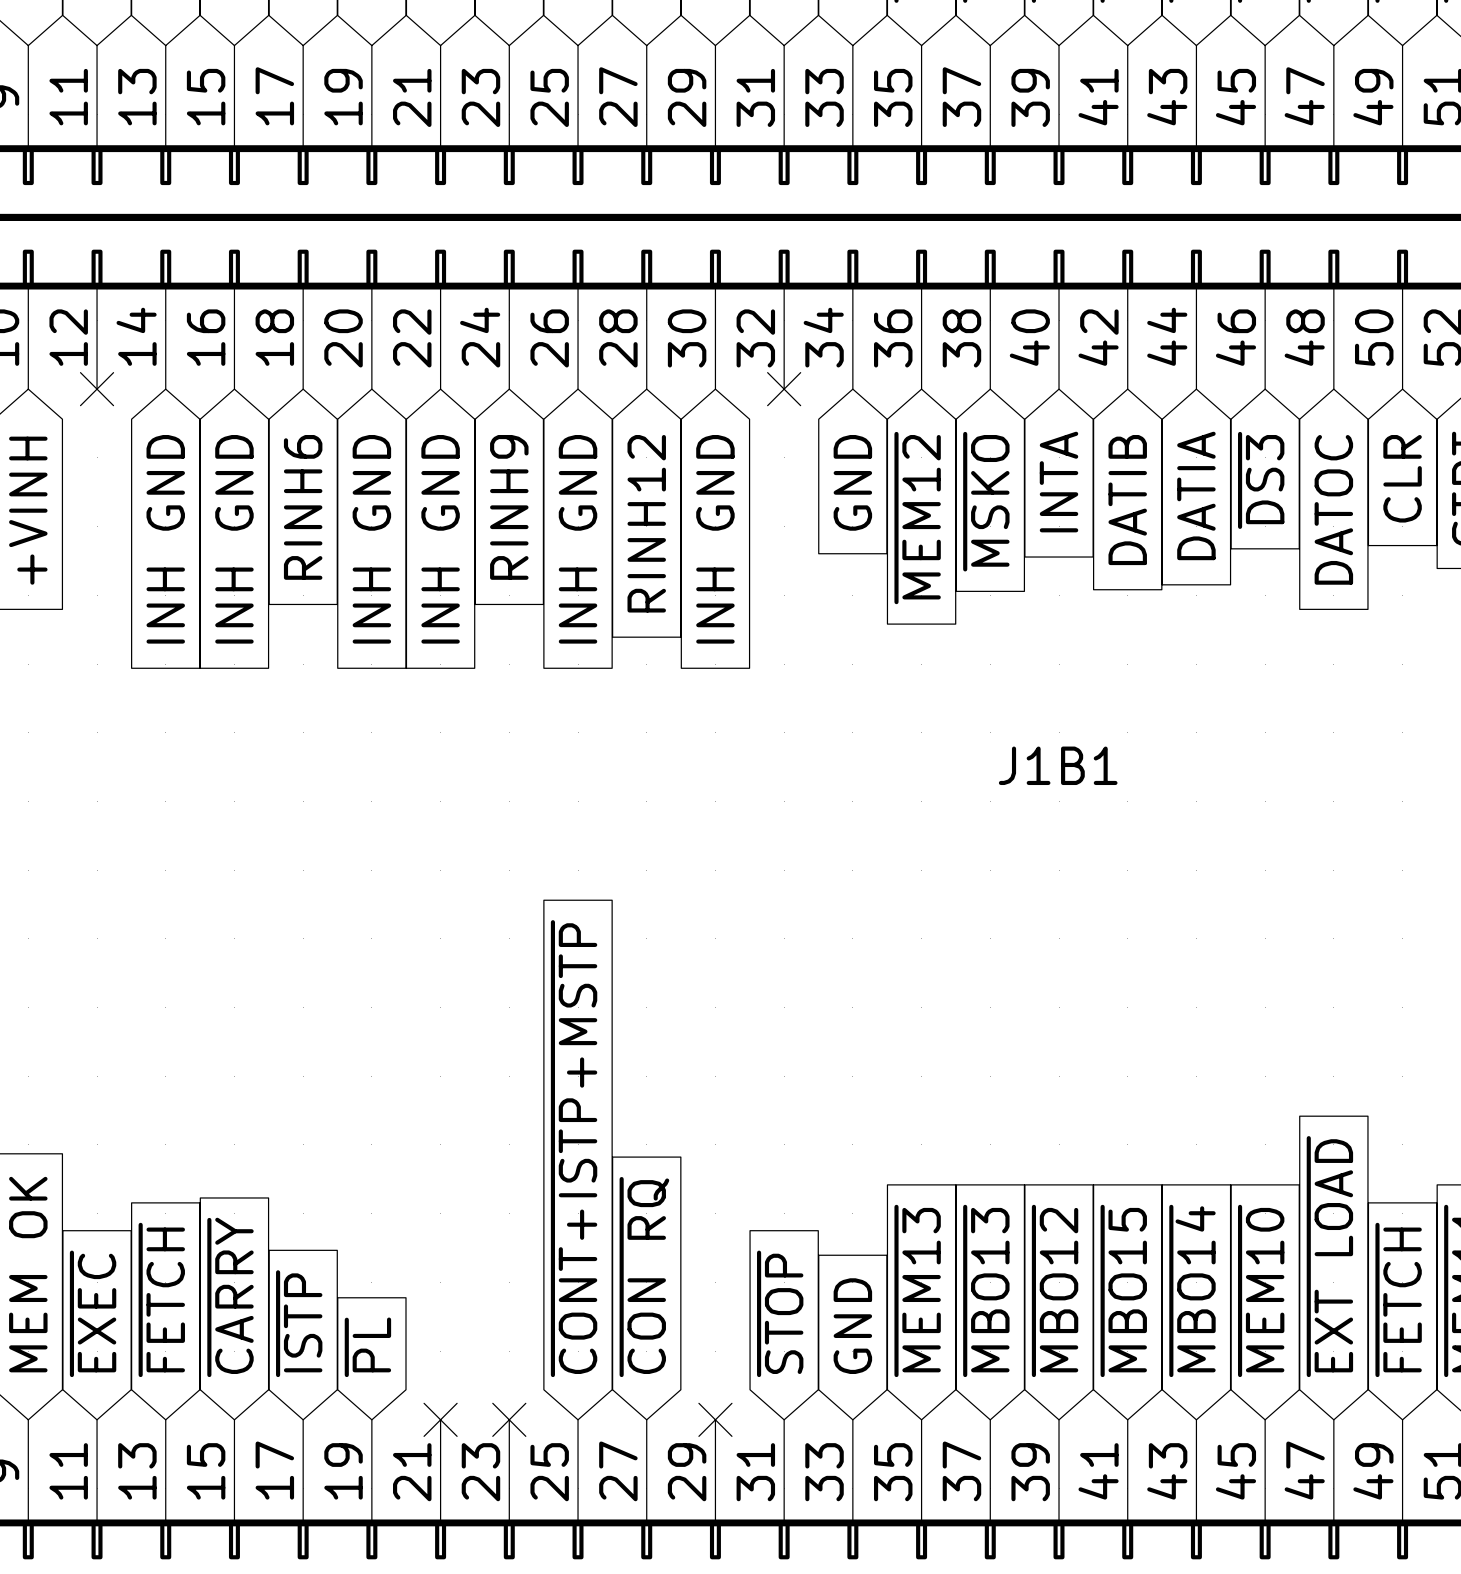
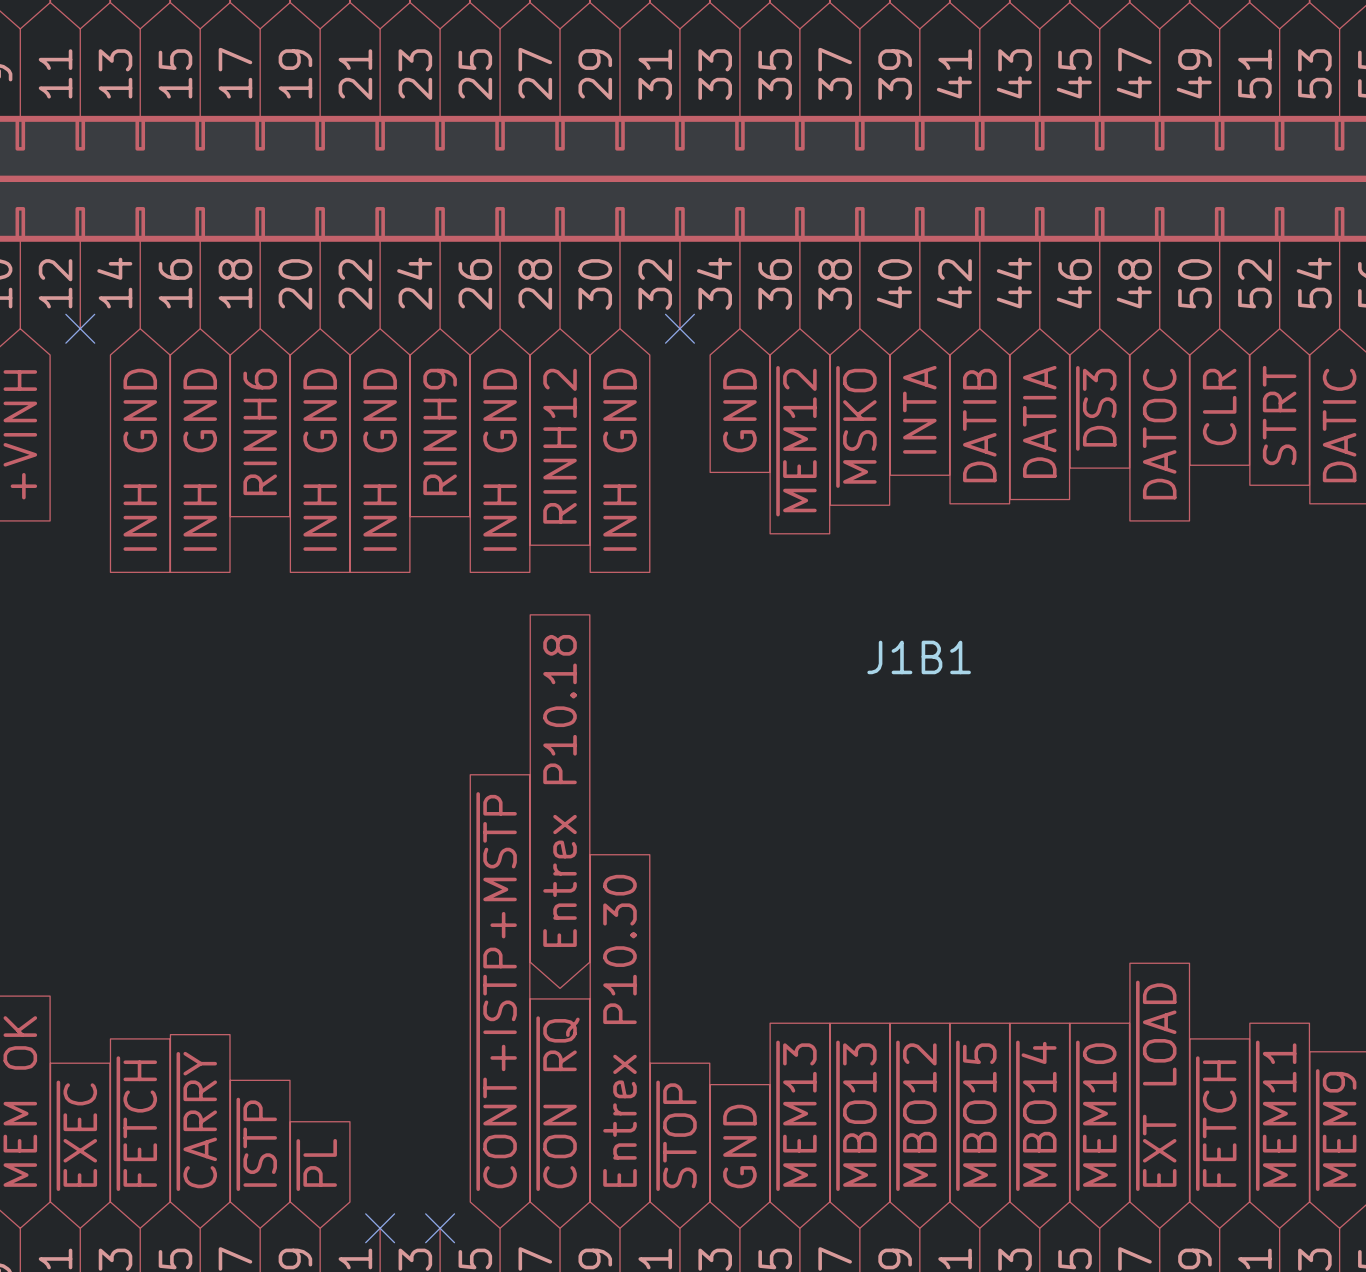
global label: none -> Entrex P10.18 (560, 790)
global label: none -> Entrex P10.30 (619, 1030)
no-connect mark: (715, 1419) -> none

